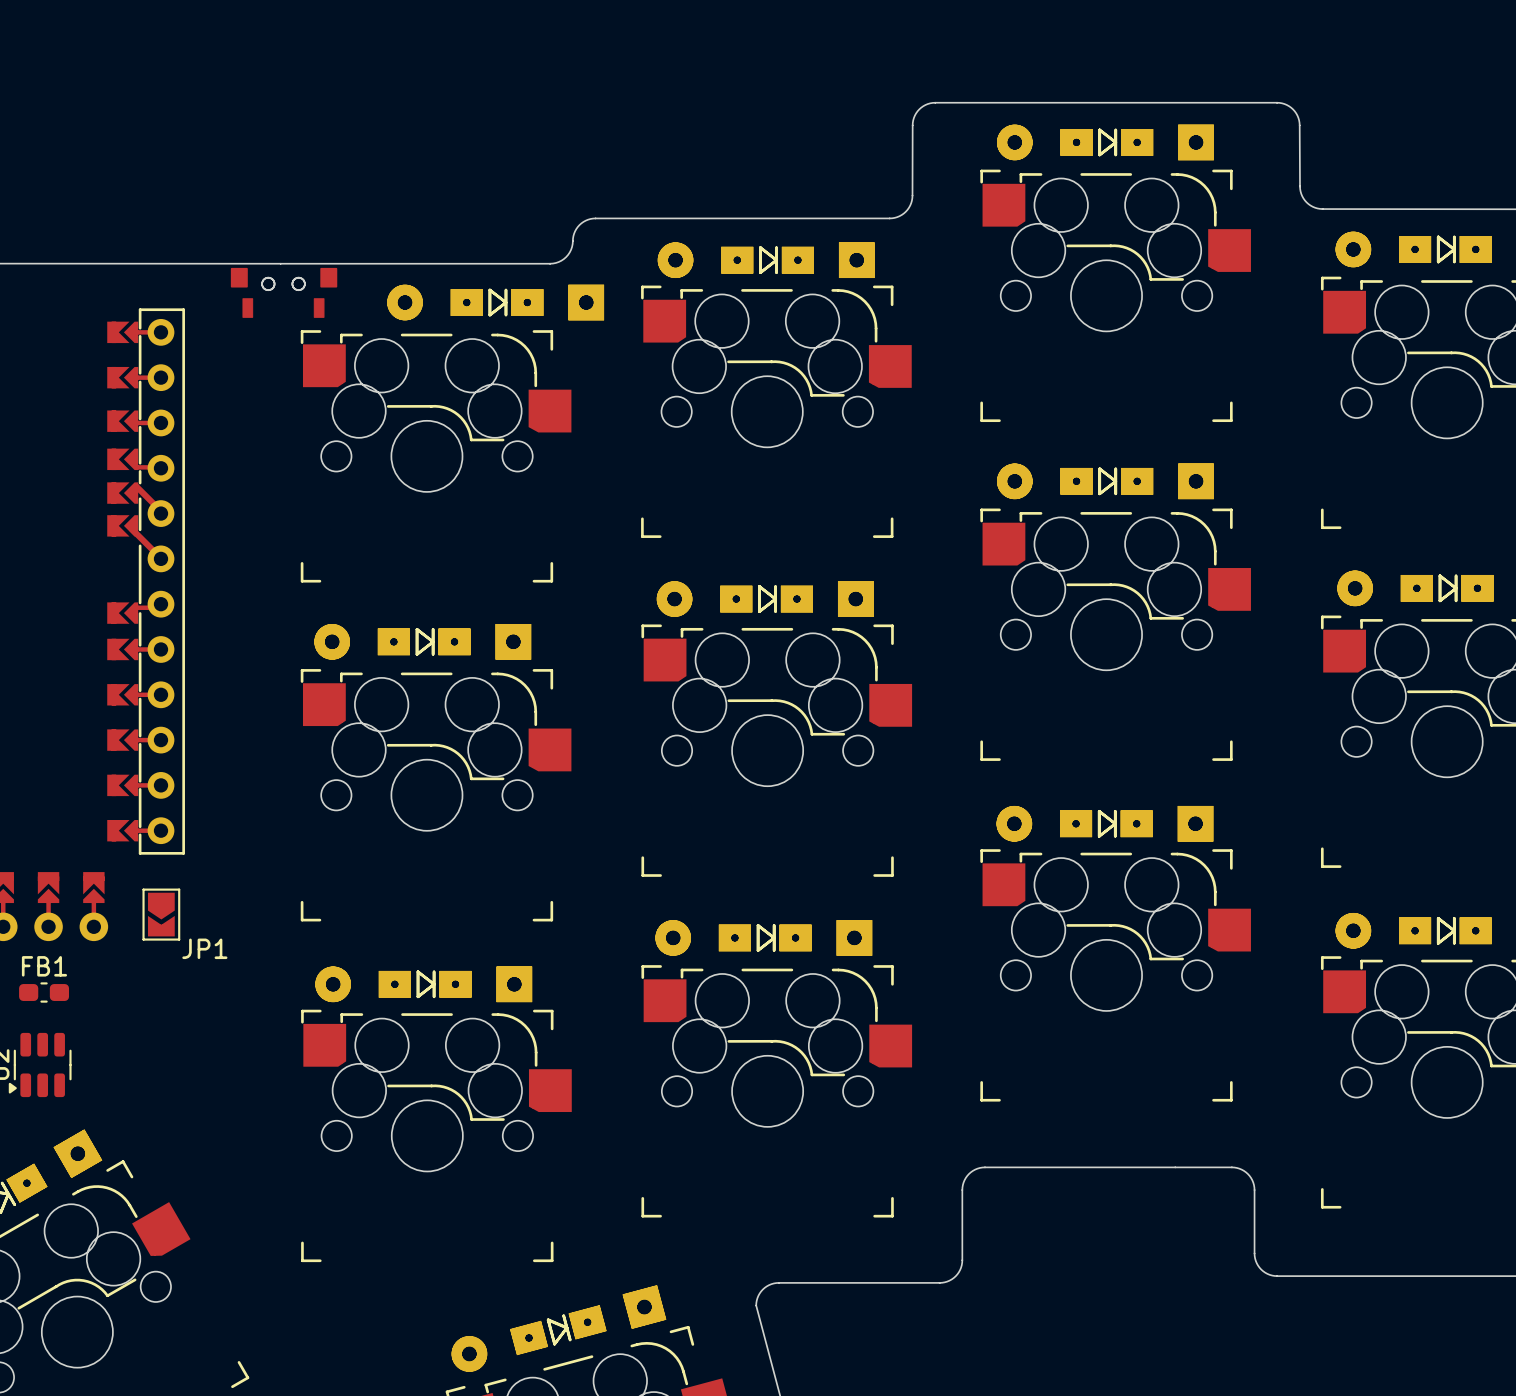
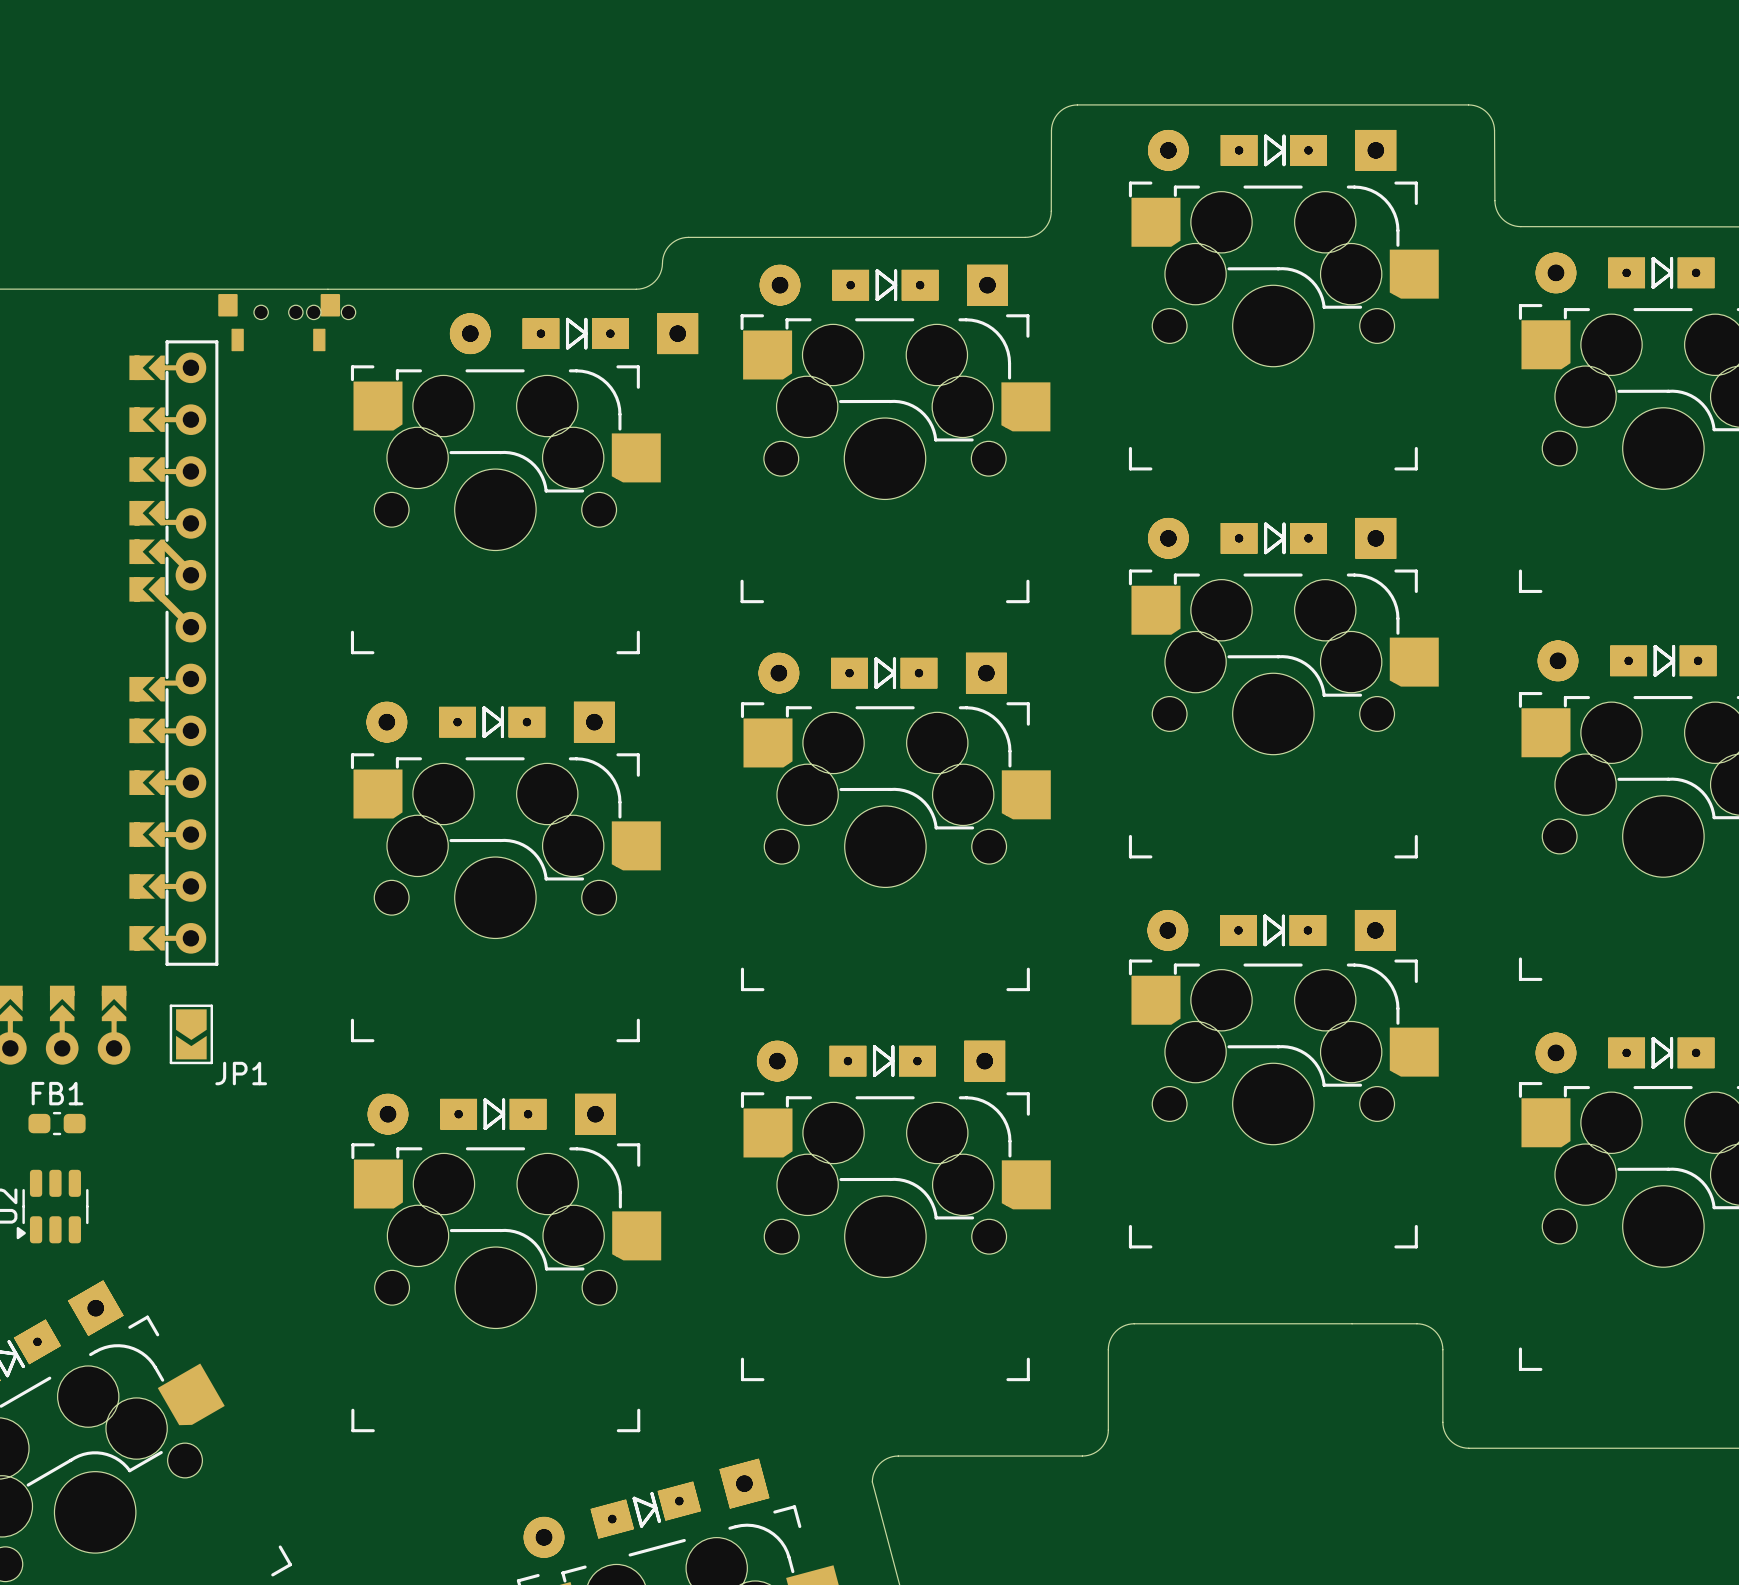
part position: (284, 292) -> (279, 322)

